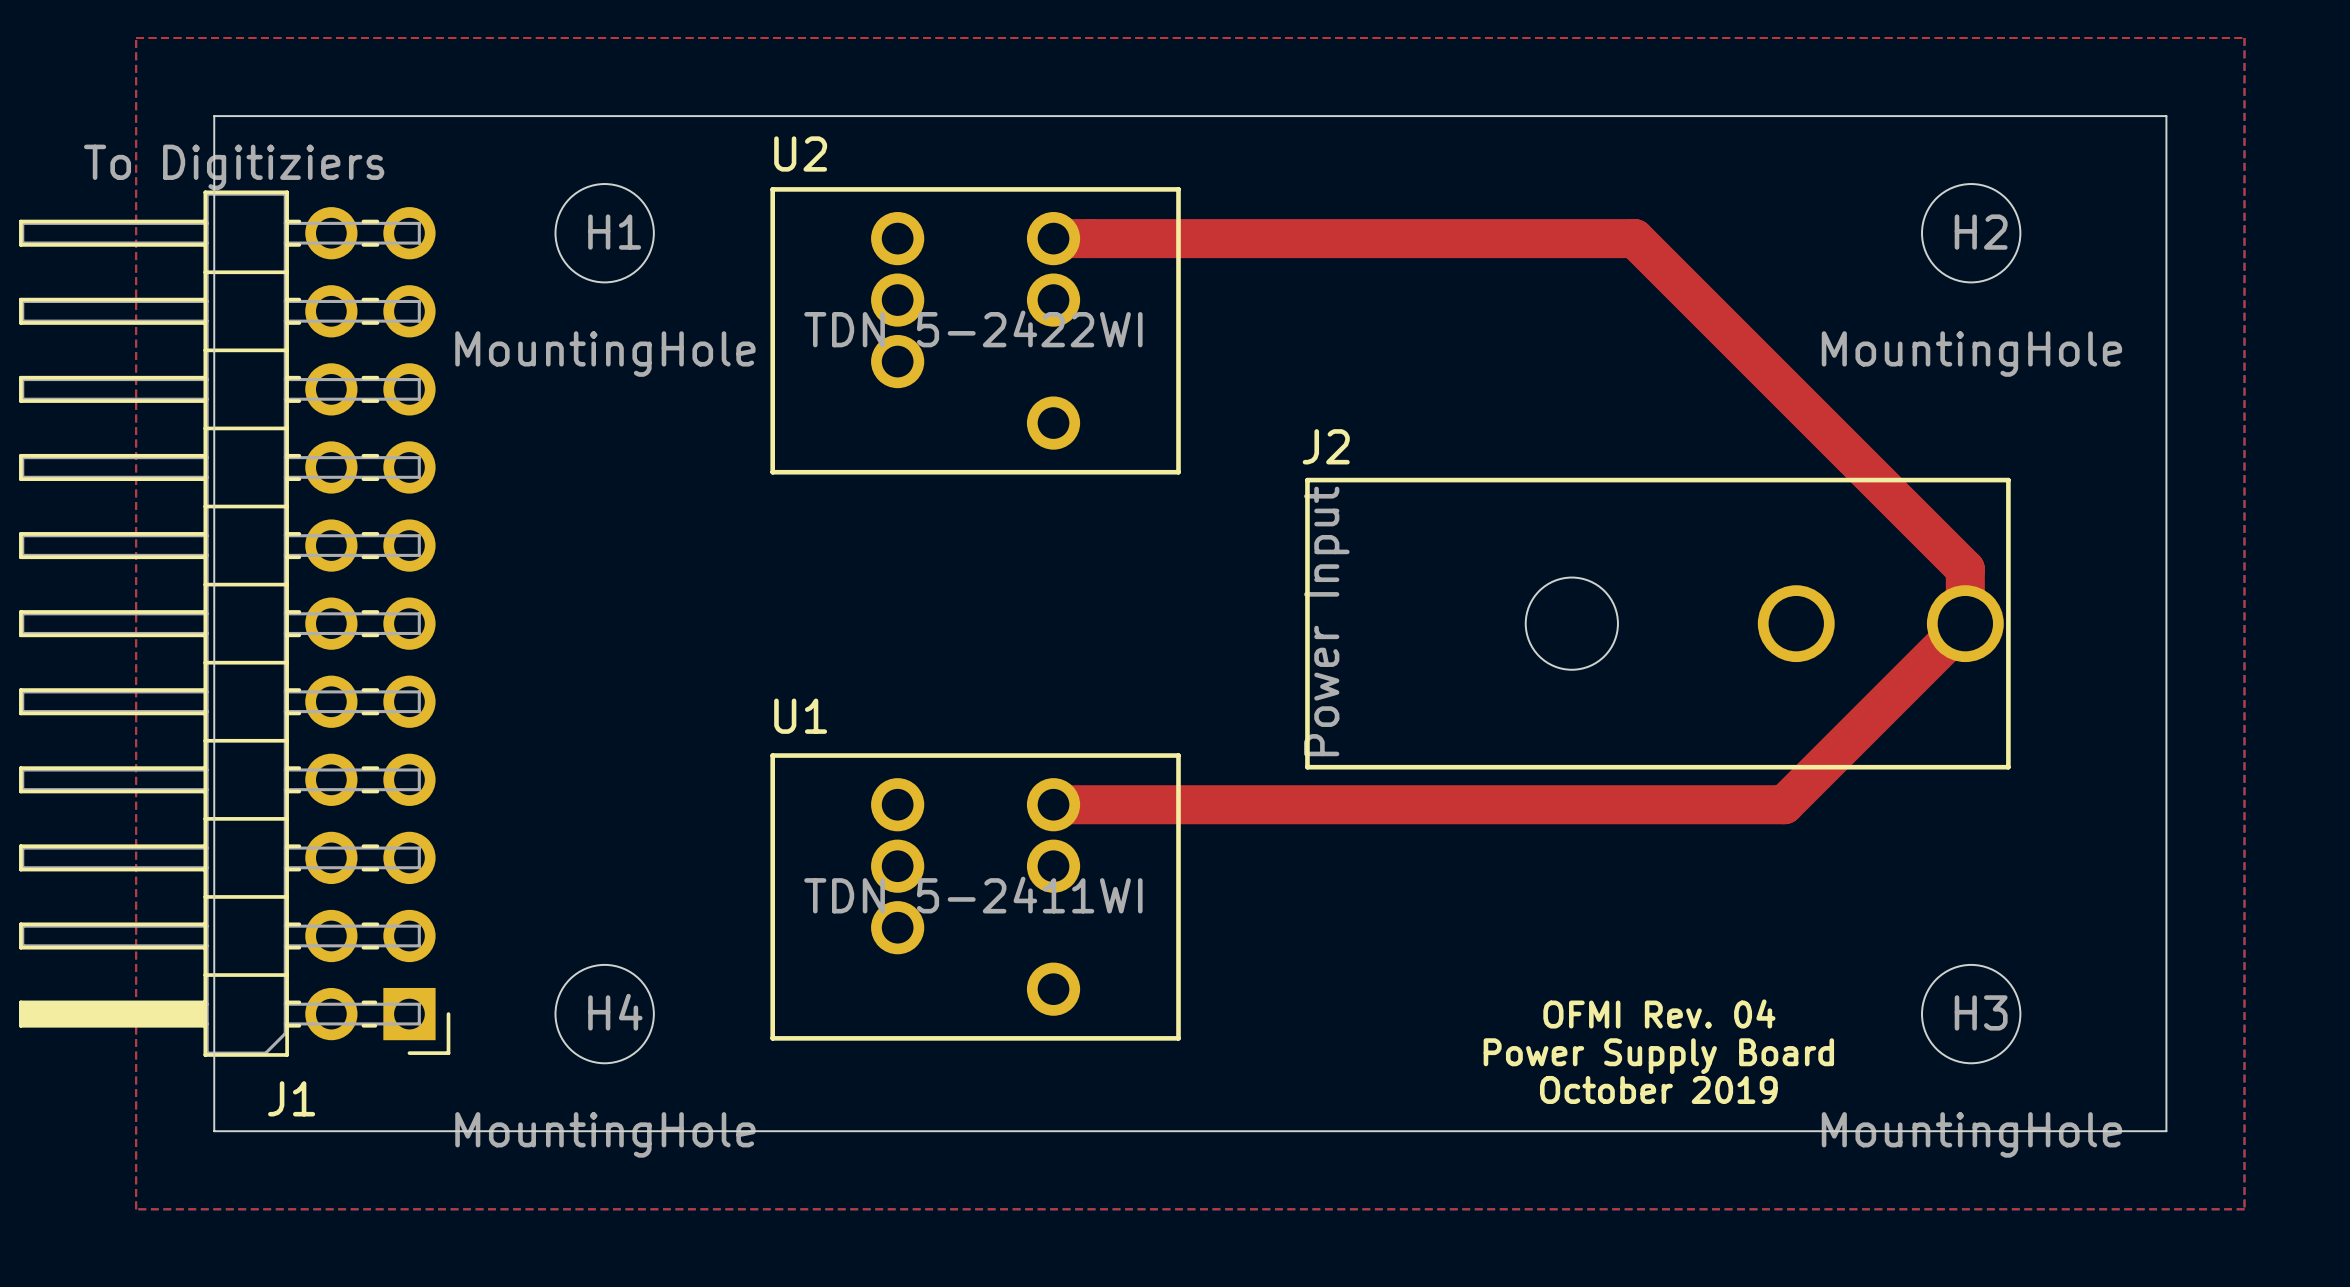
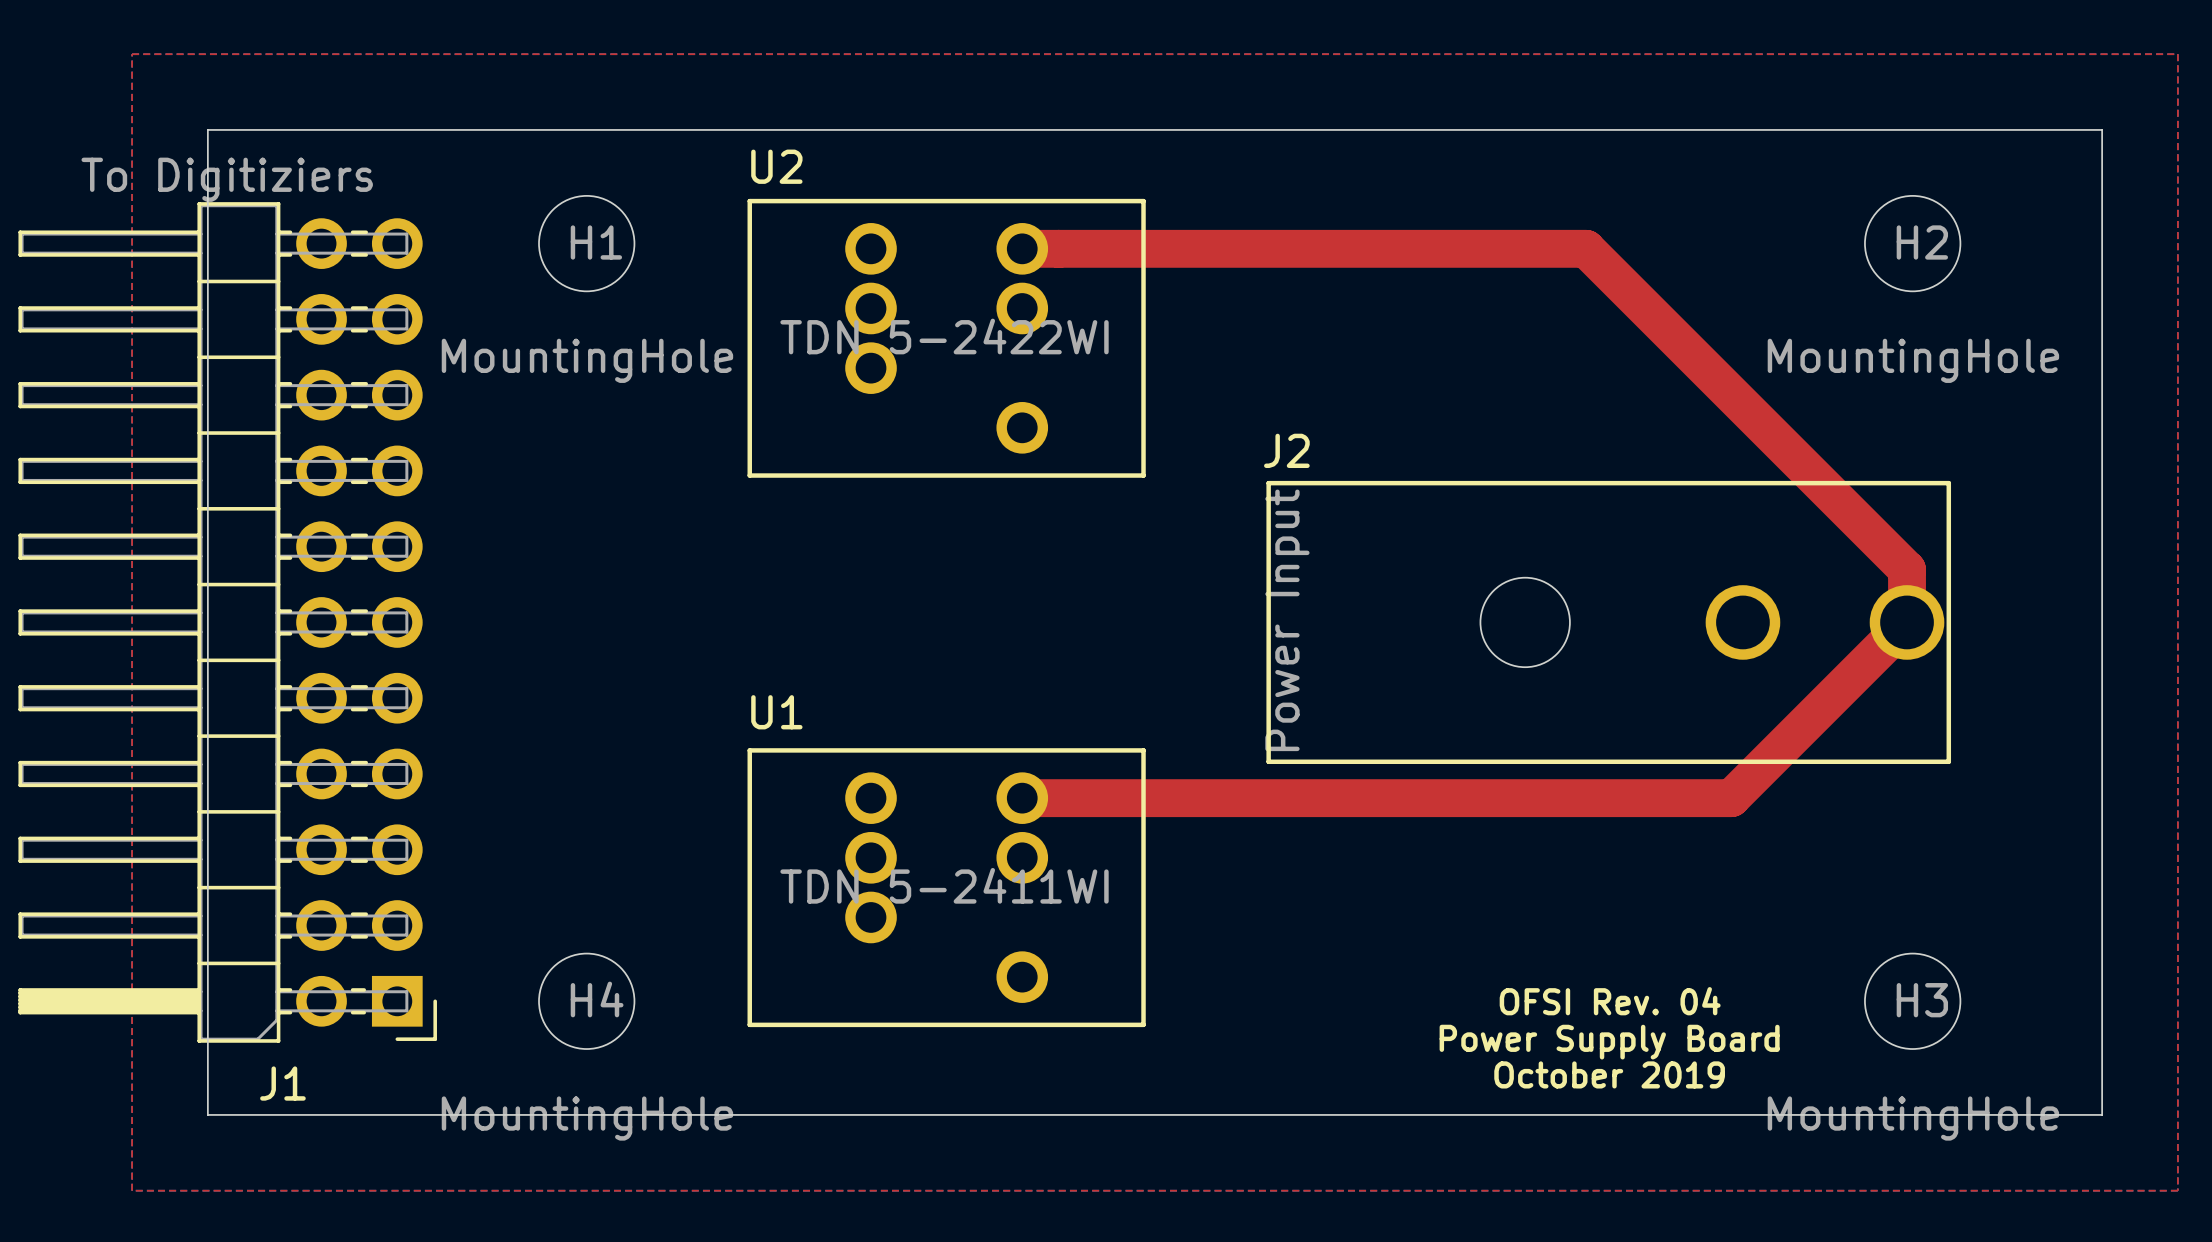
text: OFMI Rev. 04 (1659, 1013) -> OFSI Rev. 04 (1610, 1001)

